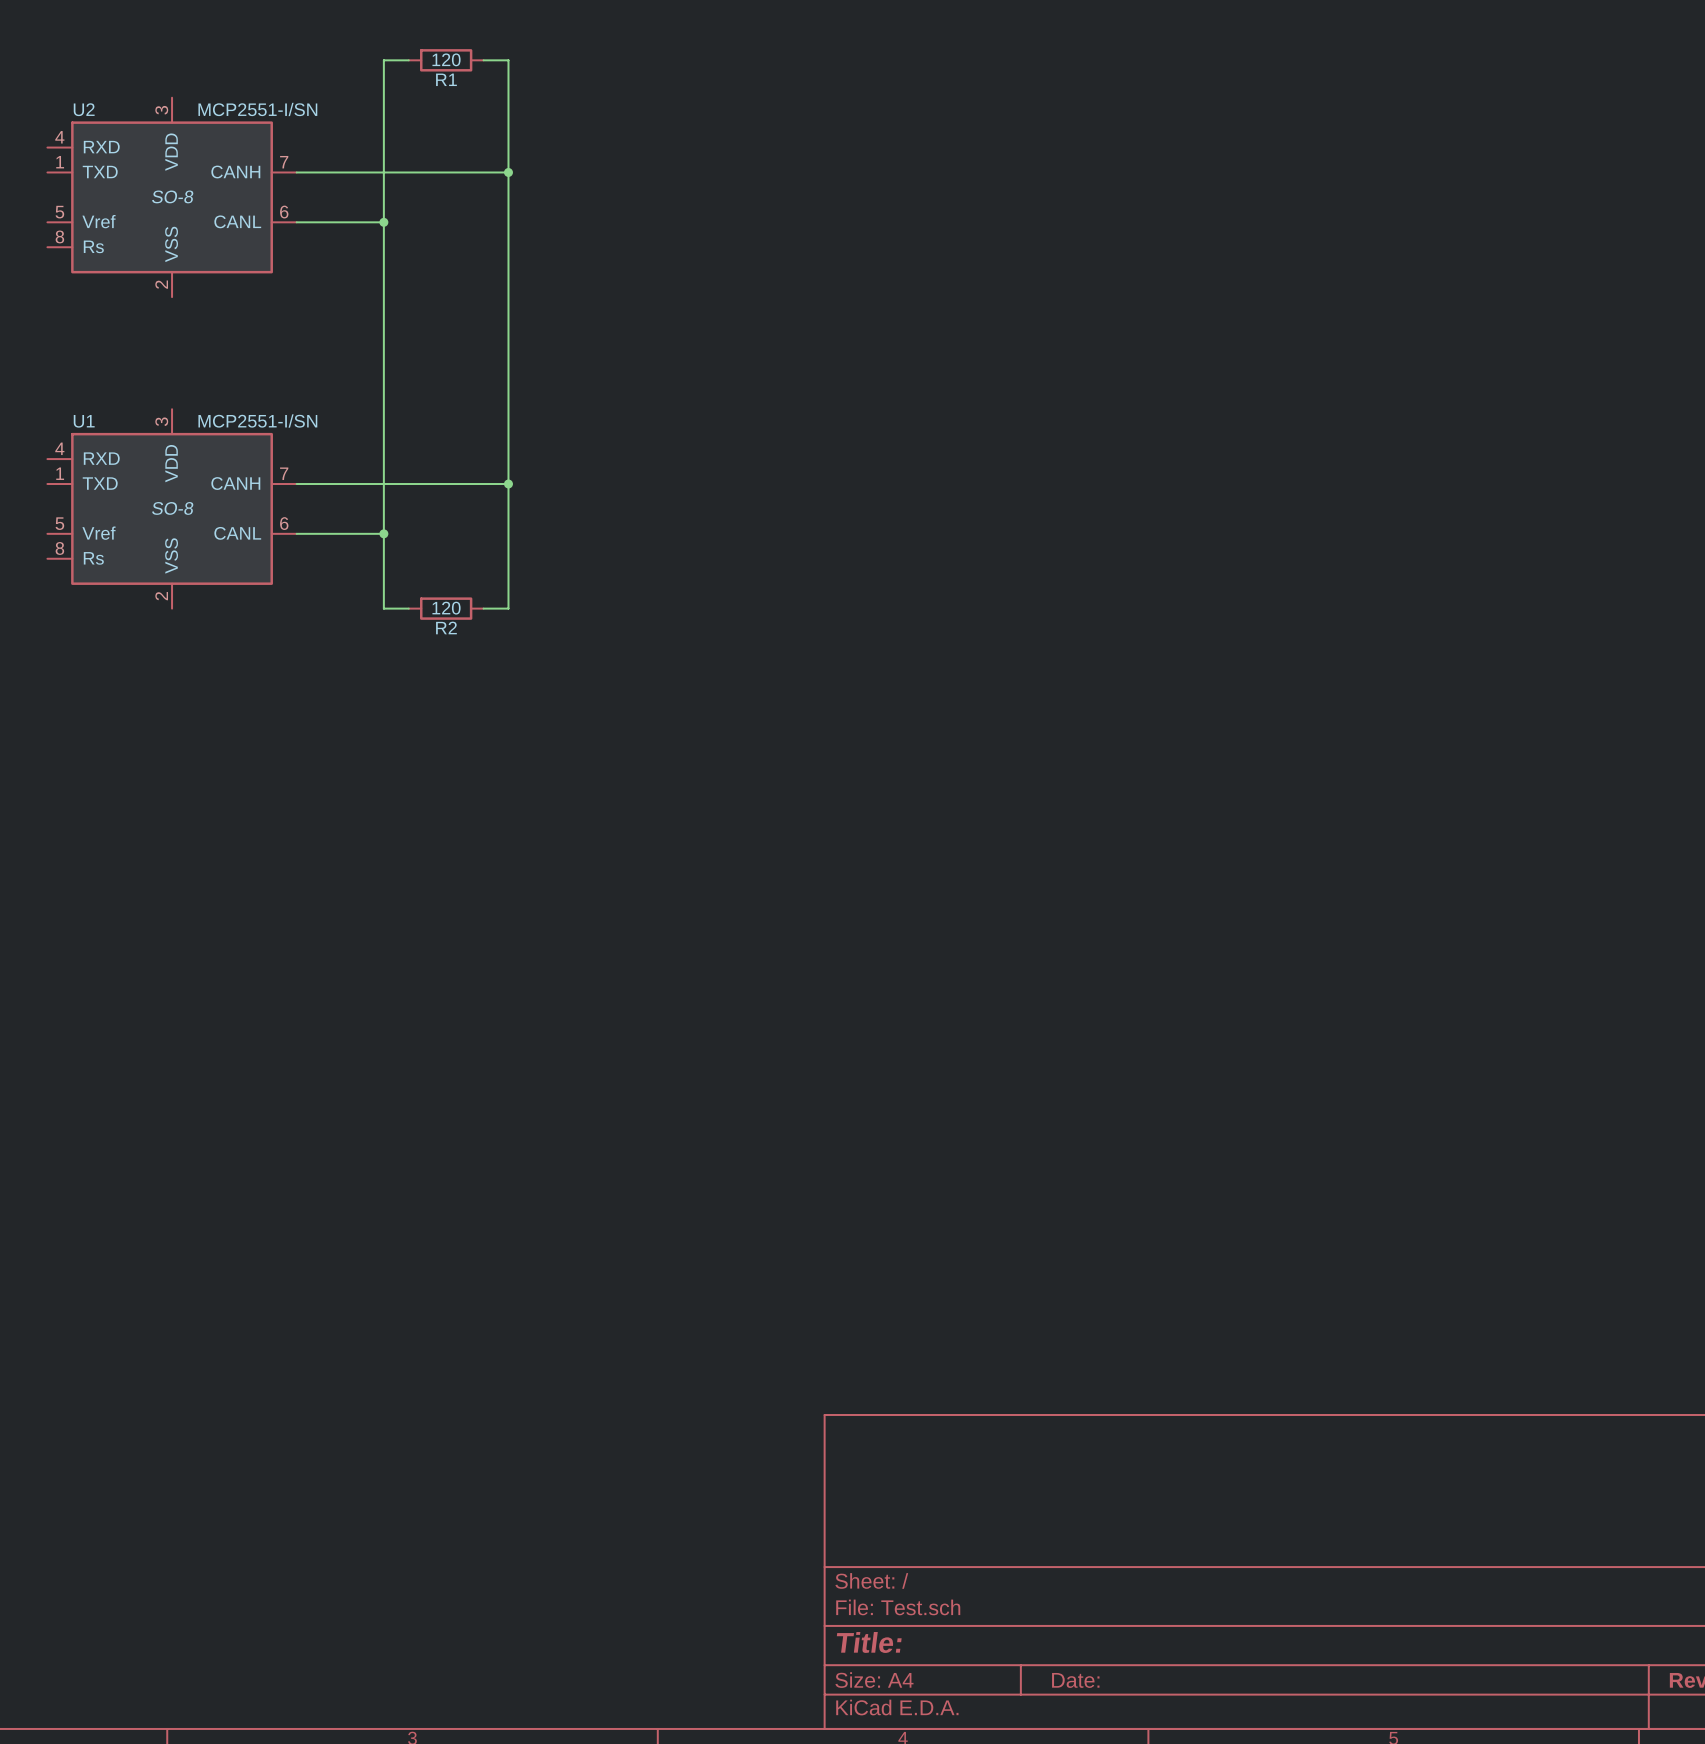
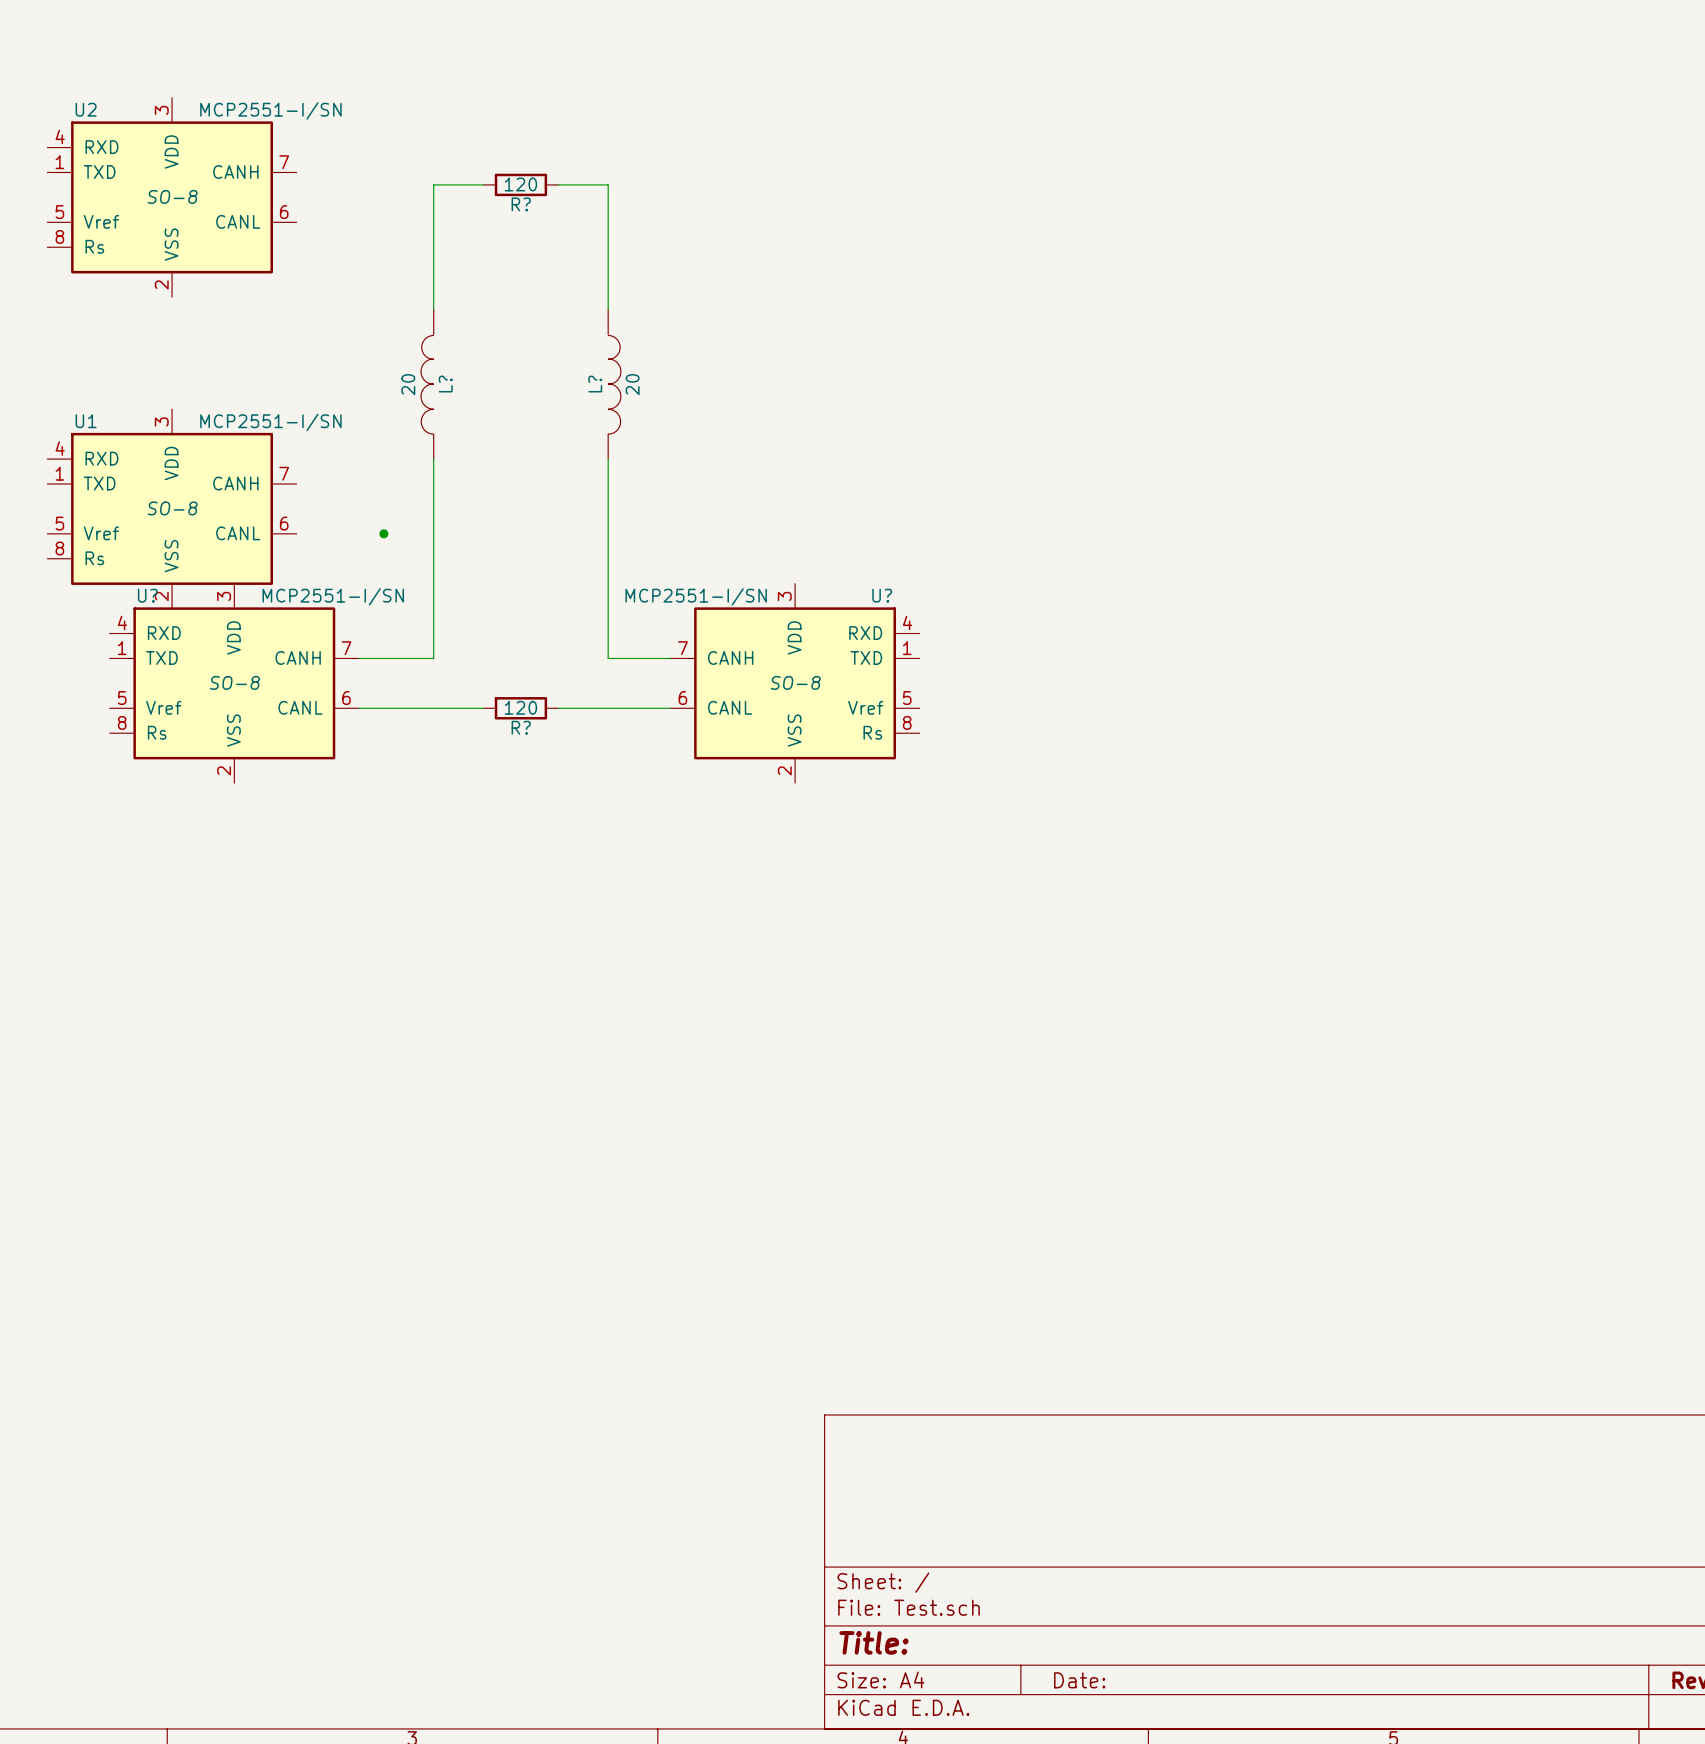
wire: (408, 60) (383, 60) (383, 608) (408, 608) -> none
R1: 120 (446, 60) -> none
wire: (483, 60) (508, 60) (508, 608) (483, 608) -> none
wire: (296, 172) (508, 172) -> none
junction: (508, 172) -> none
wire: none -> (483, 184) (433, 184) (433, 309)
R?: none -> 120 (520, 184)
wire: none -> (558, 184) (608, 184) (608, 309)
wire: (296, 222) (383, 222) -> none
junction: (383, 222) -> none
L?: none -> 20 (427, 384)
L?: none -> 20 (614, 384)
wire: none -> (433, 459) (433, 658) (358, 658)
wire: none -> (608, 459) (608, 658) (670, 658)
wire: (296, 484) (508, 484) -> none
junction: (508, 484) -> none
wire: (296, 533) (383, 533) -> none
R2: 120 (446, 608) -> none
U?: none -> MCP2551-I/SN (234, 683)
U?: none -> MCP2551-I/SN (795, 683)
wire: none -> (358, 708) (483, 708)
R?: none -> 120 (520, 708)
wire: none -> (558, 708) (670, 708)

